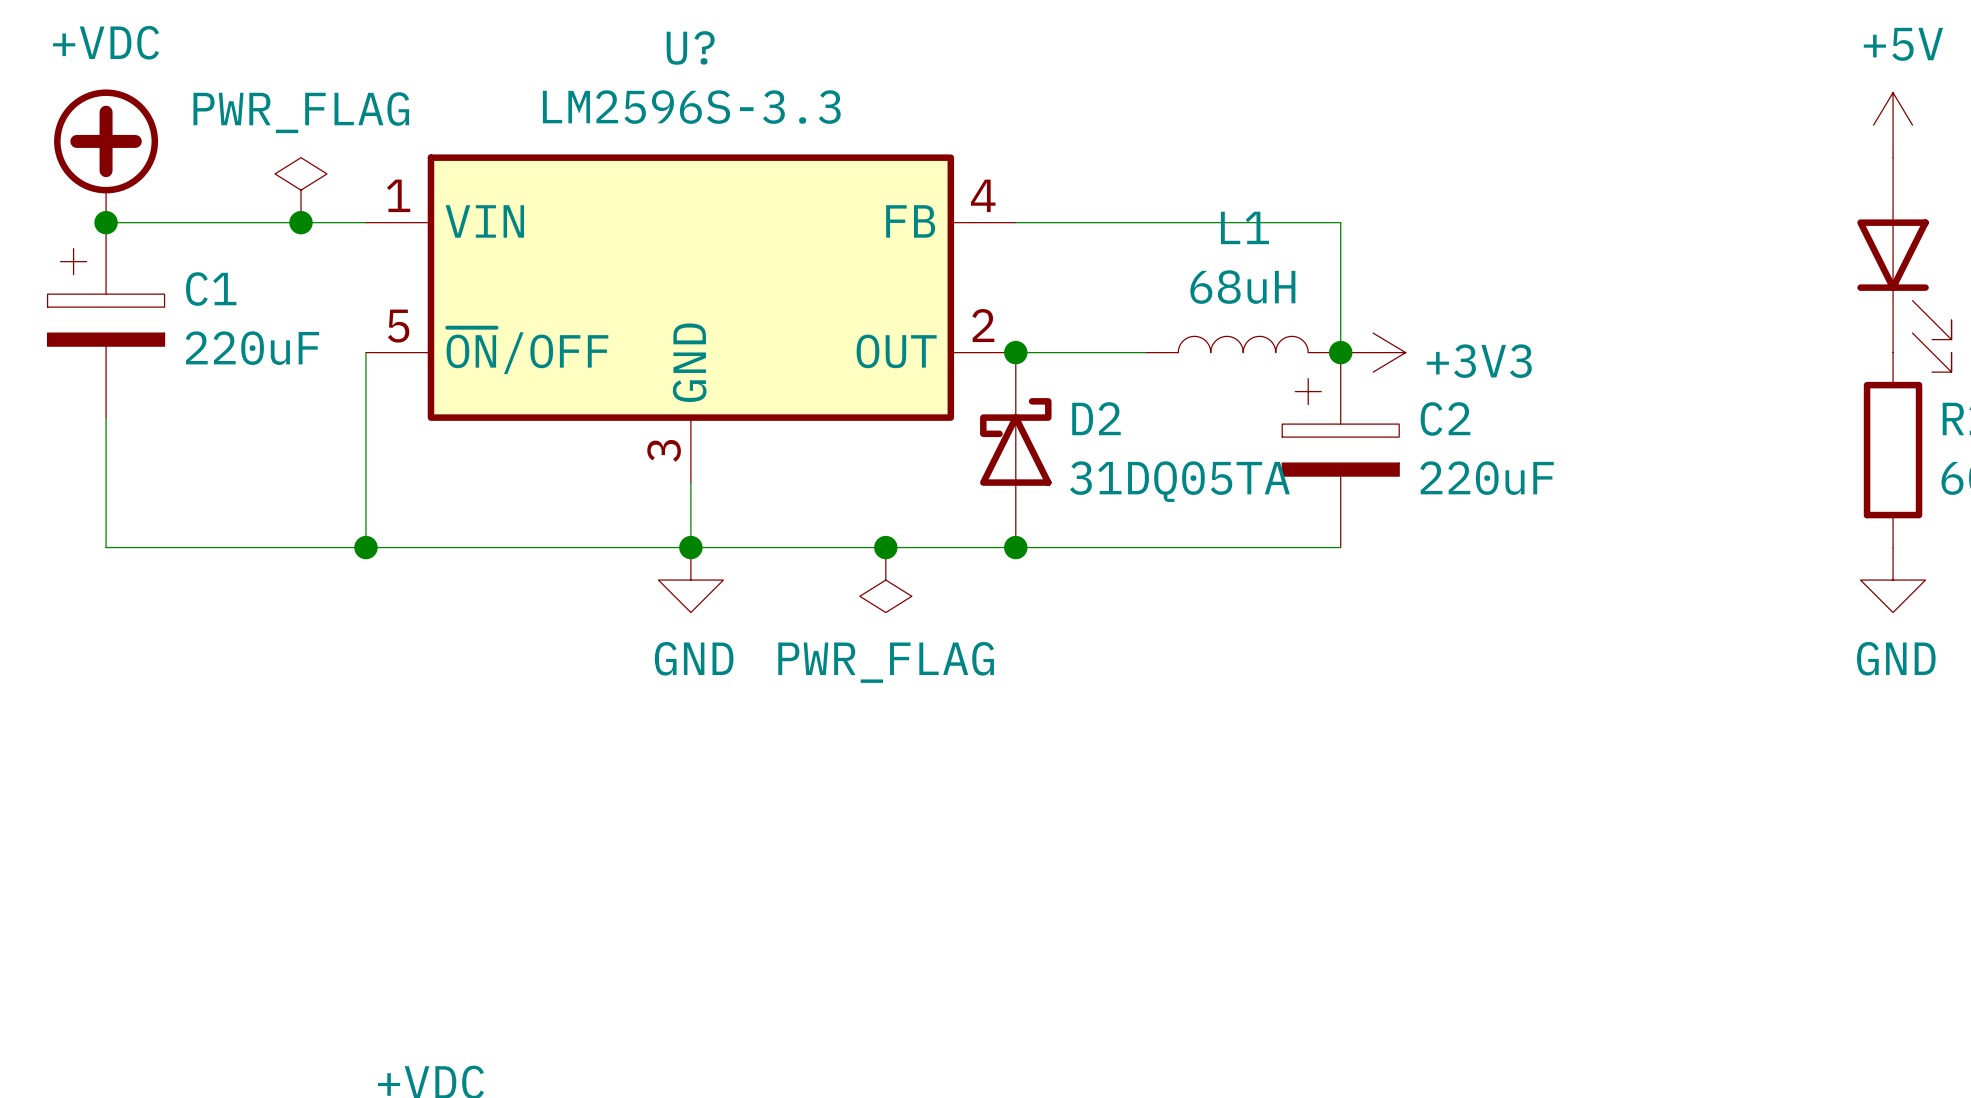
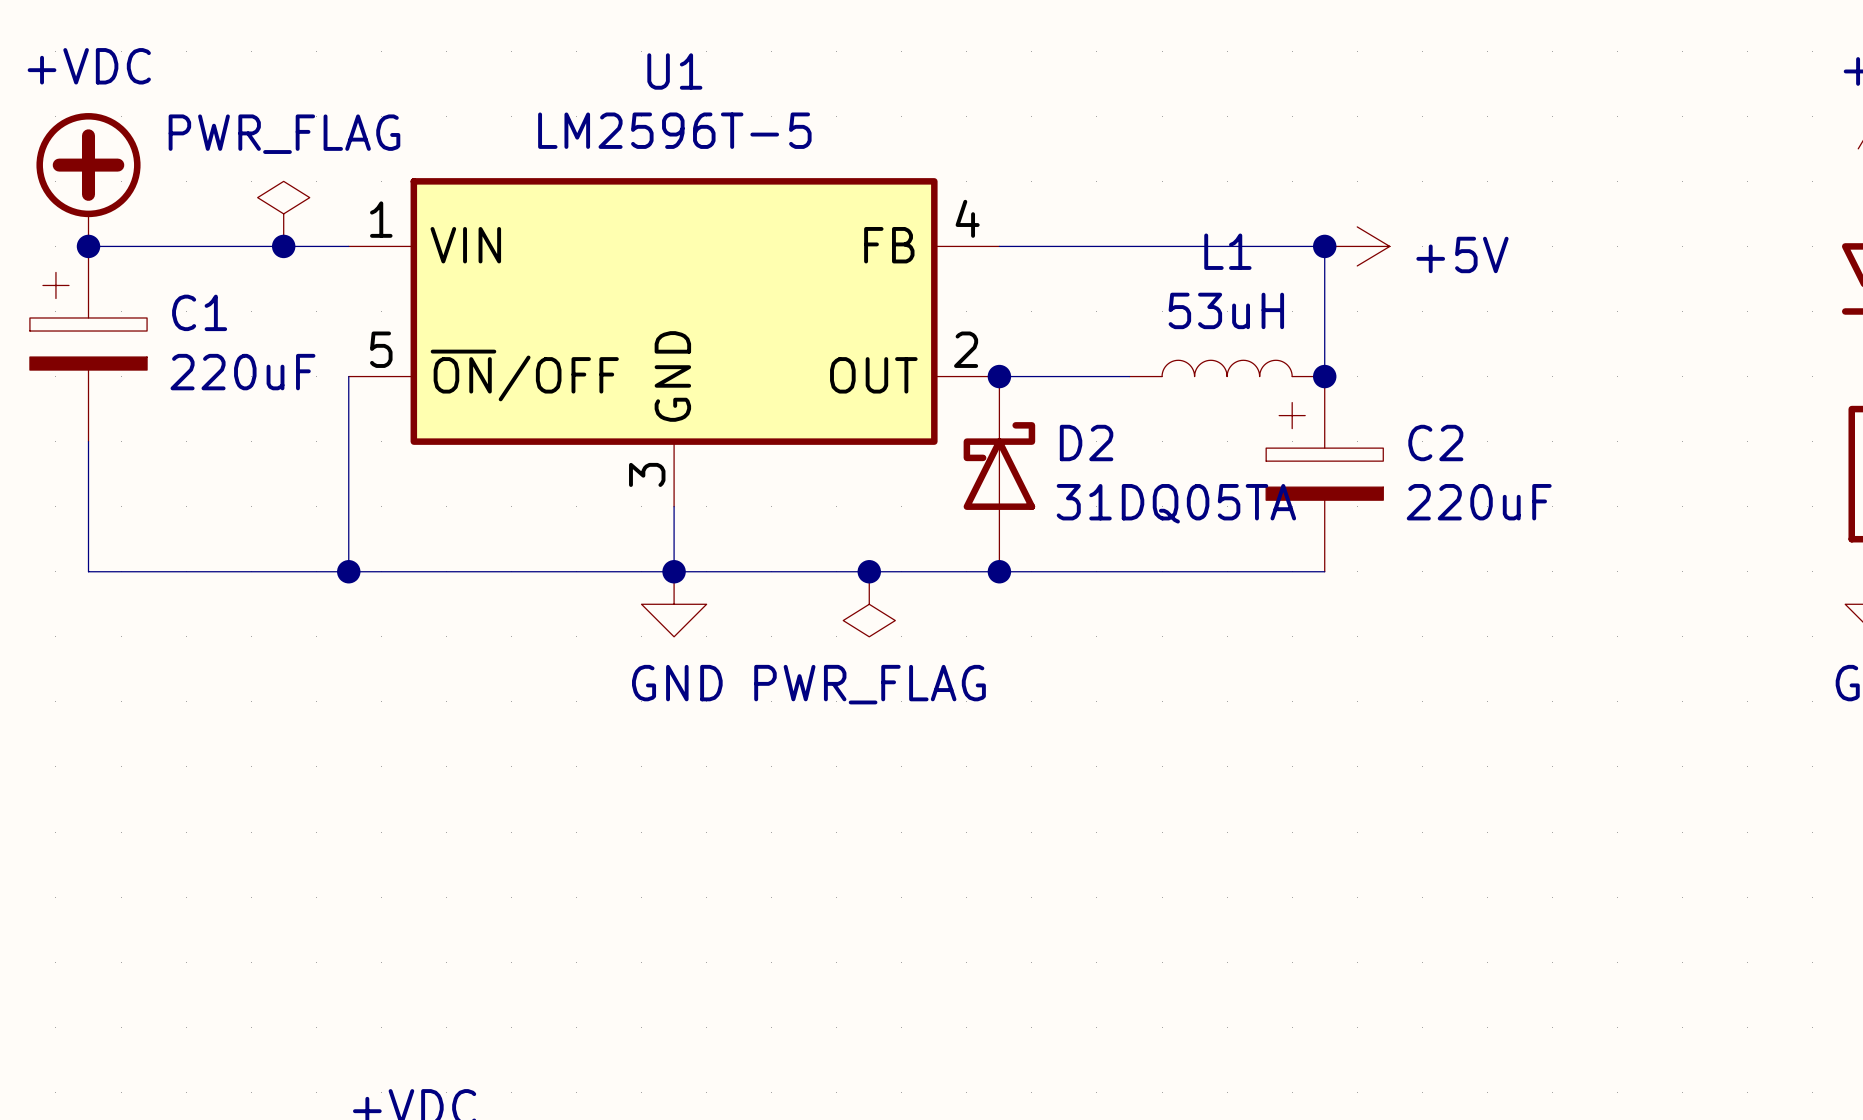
U? name: U? (690, 47) -> U1 (674, 71)
U? value: LM2596S-3.3 (691, 107) -> LM2596T-5 (674, 130)
junction: none -> (1324, 246)
power symbol: none -> +5V (1357, 246)
L1 value: 68uH (1242, 287) -> 53uH (1226, 310)
power symbol: +3V3 (1373, 352) -> none

